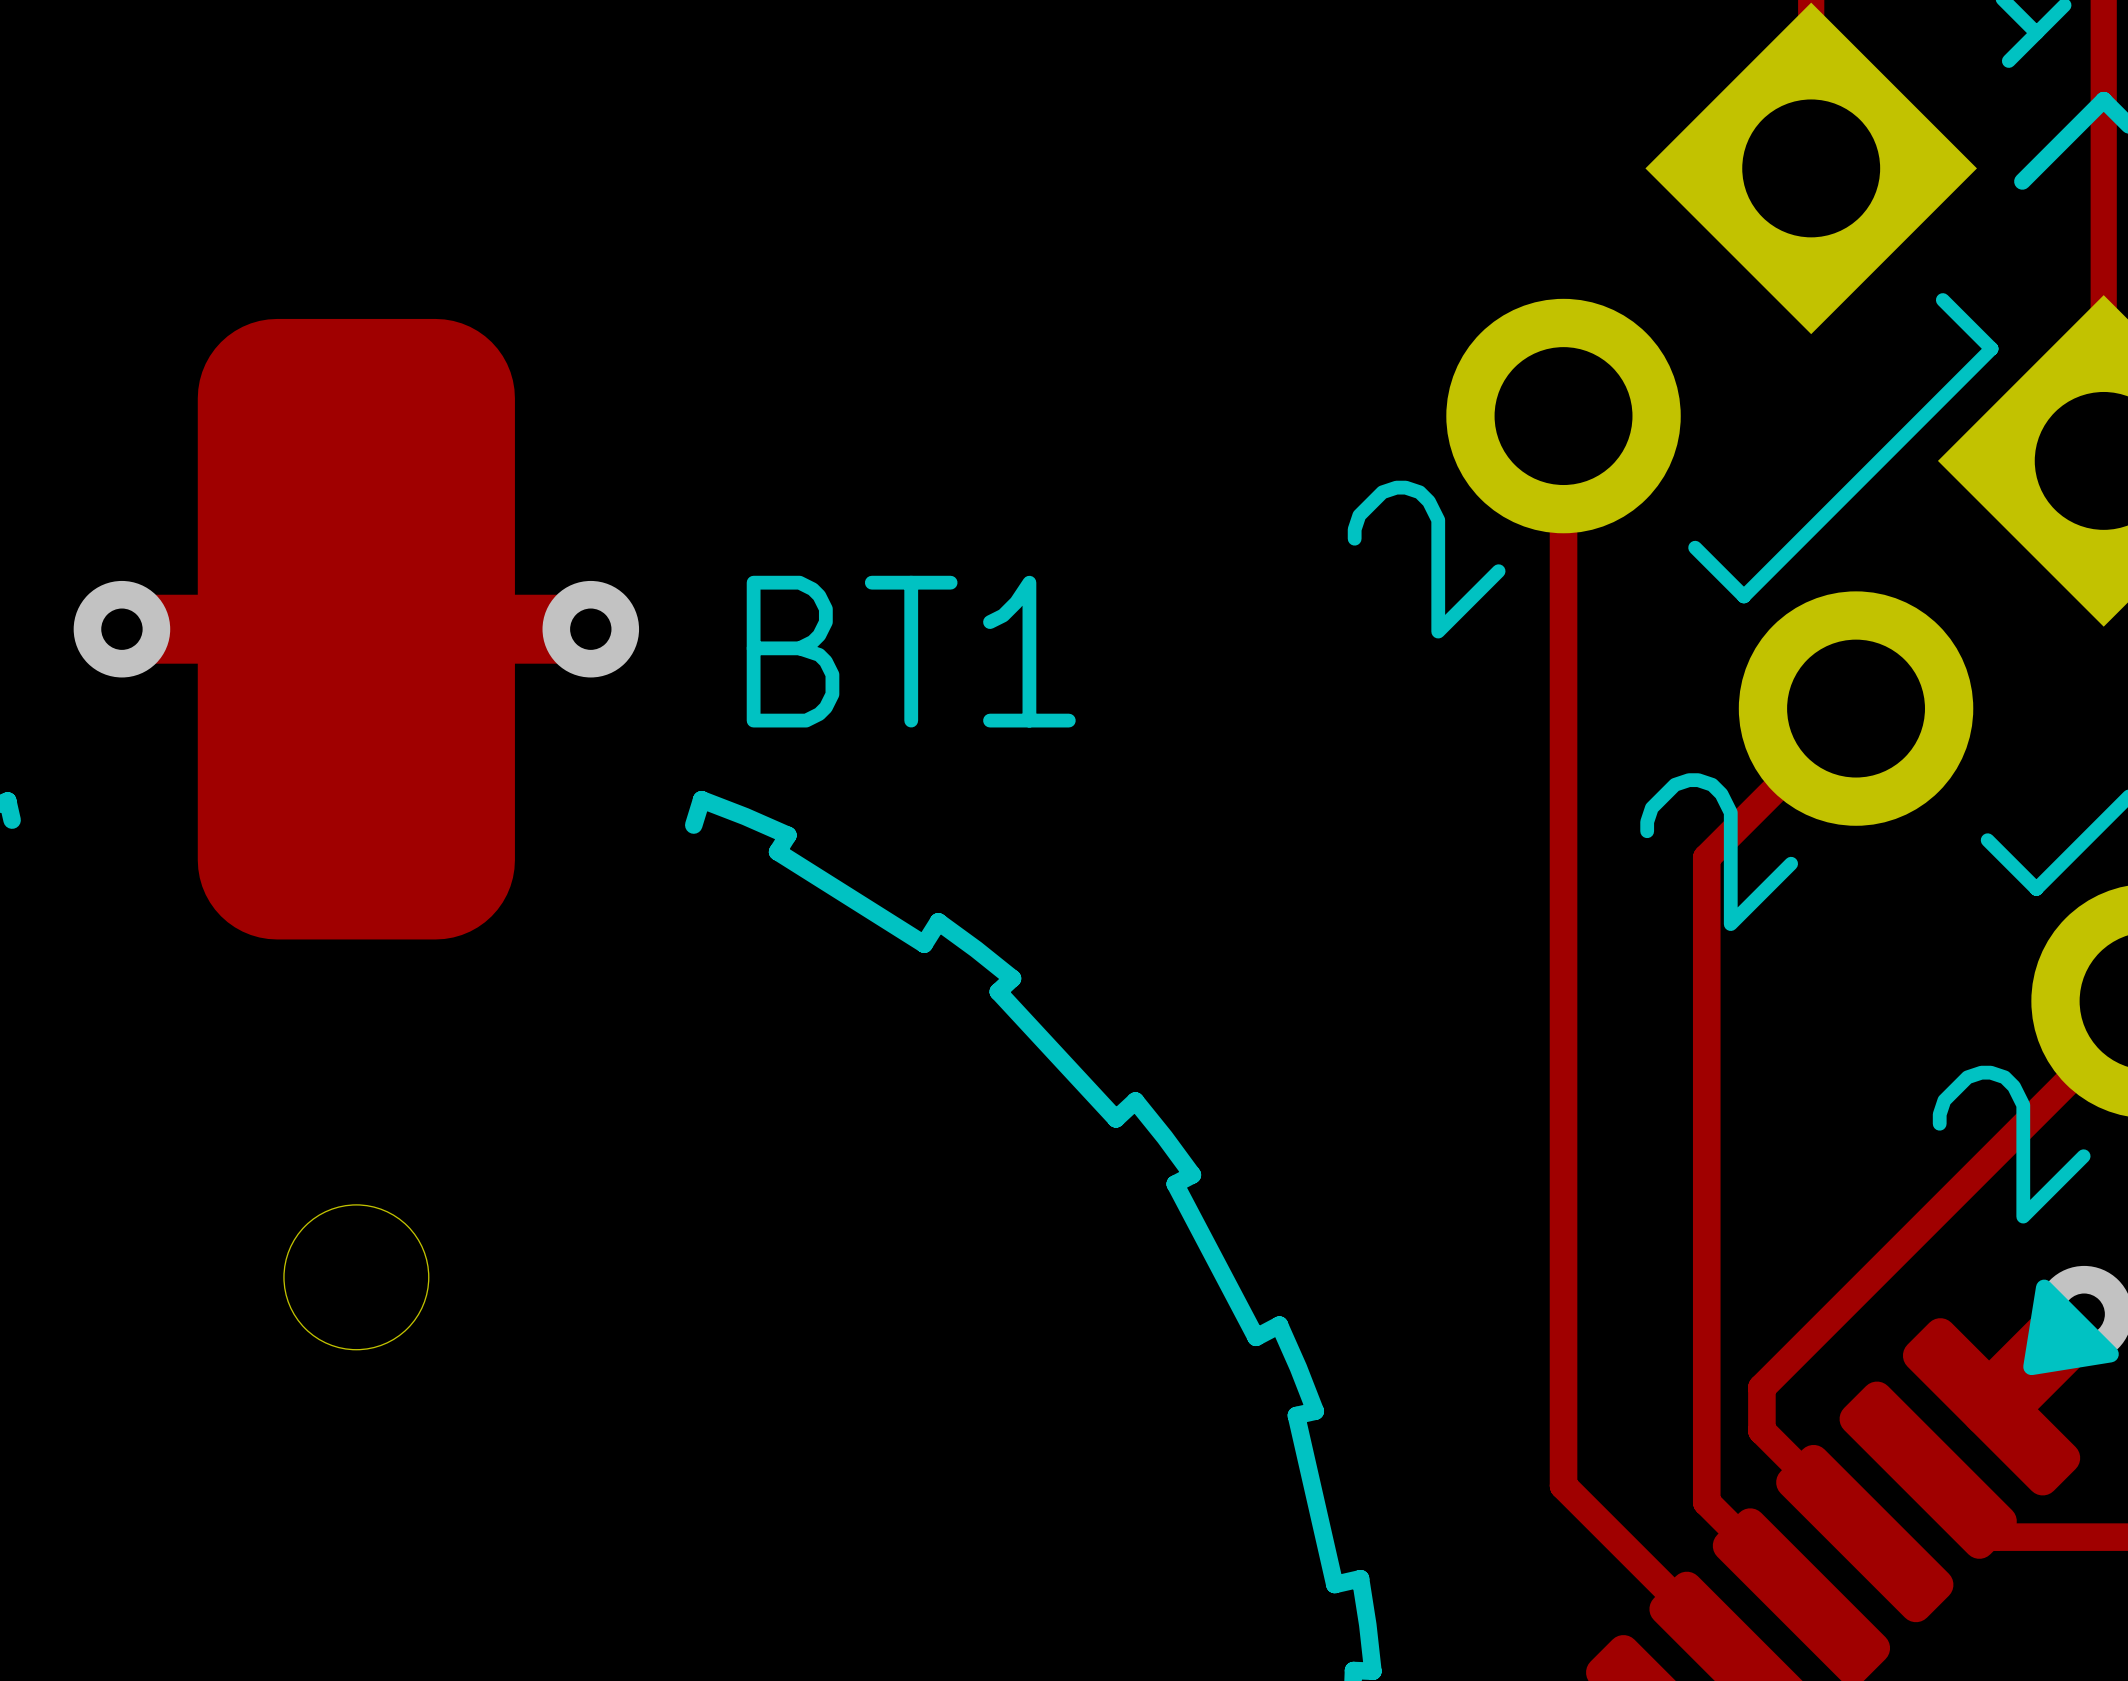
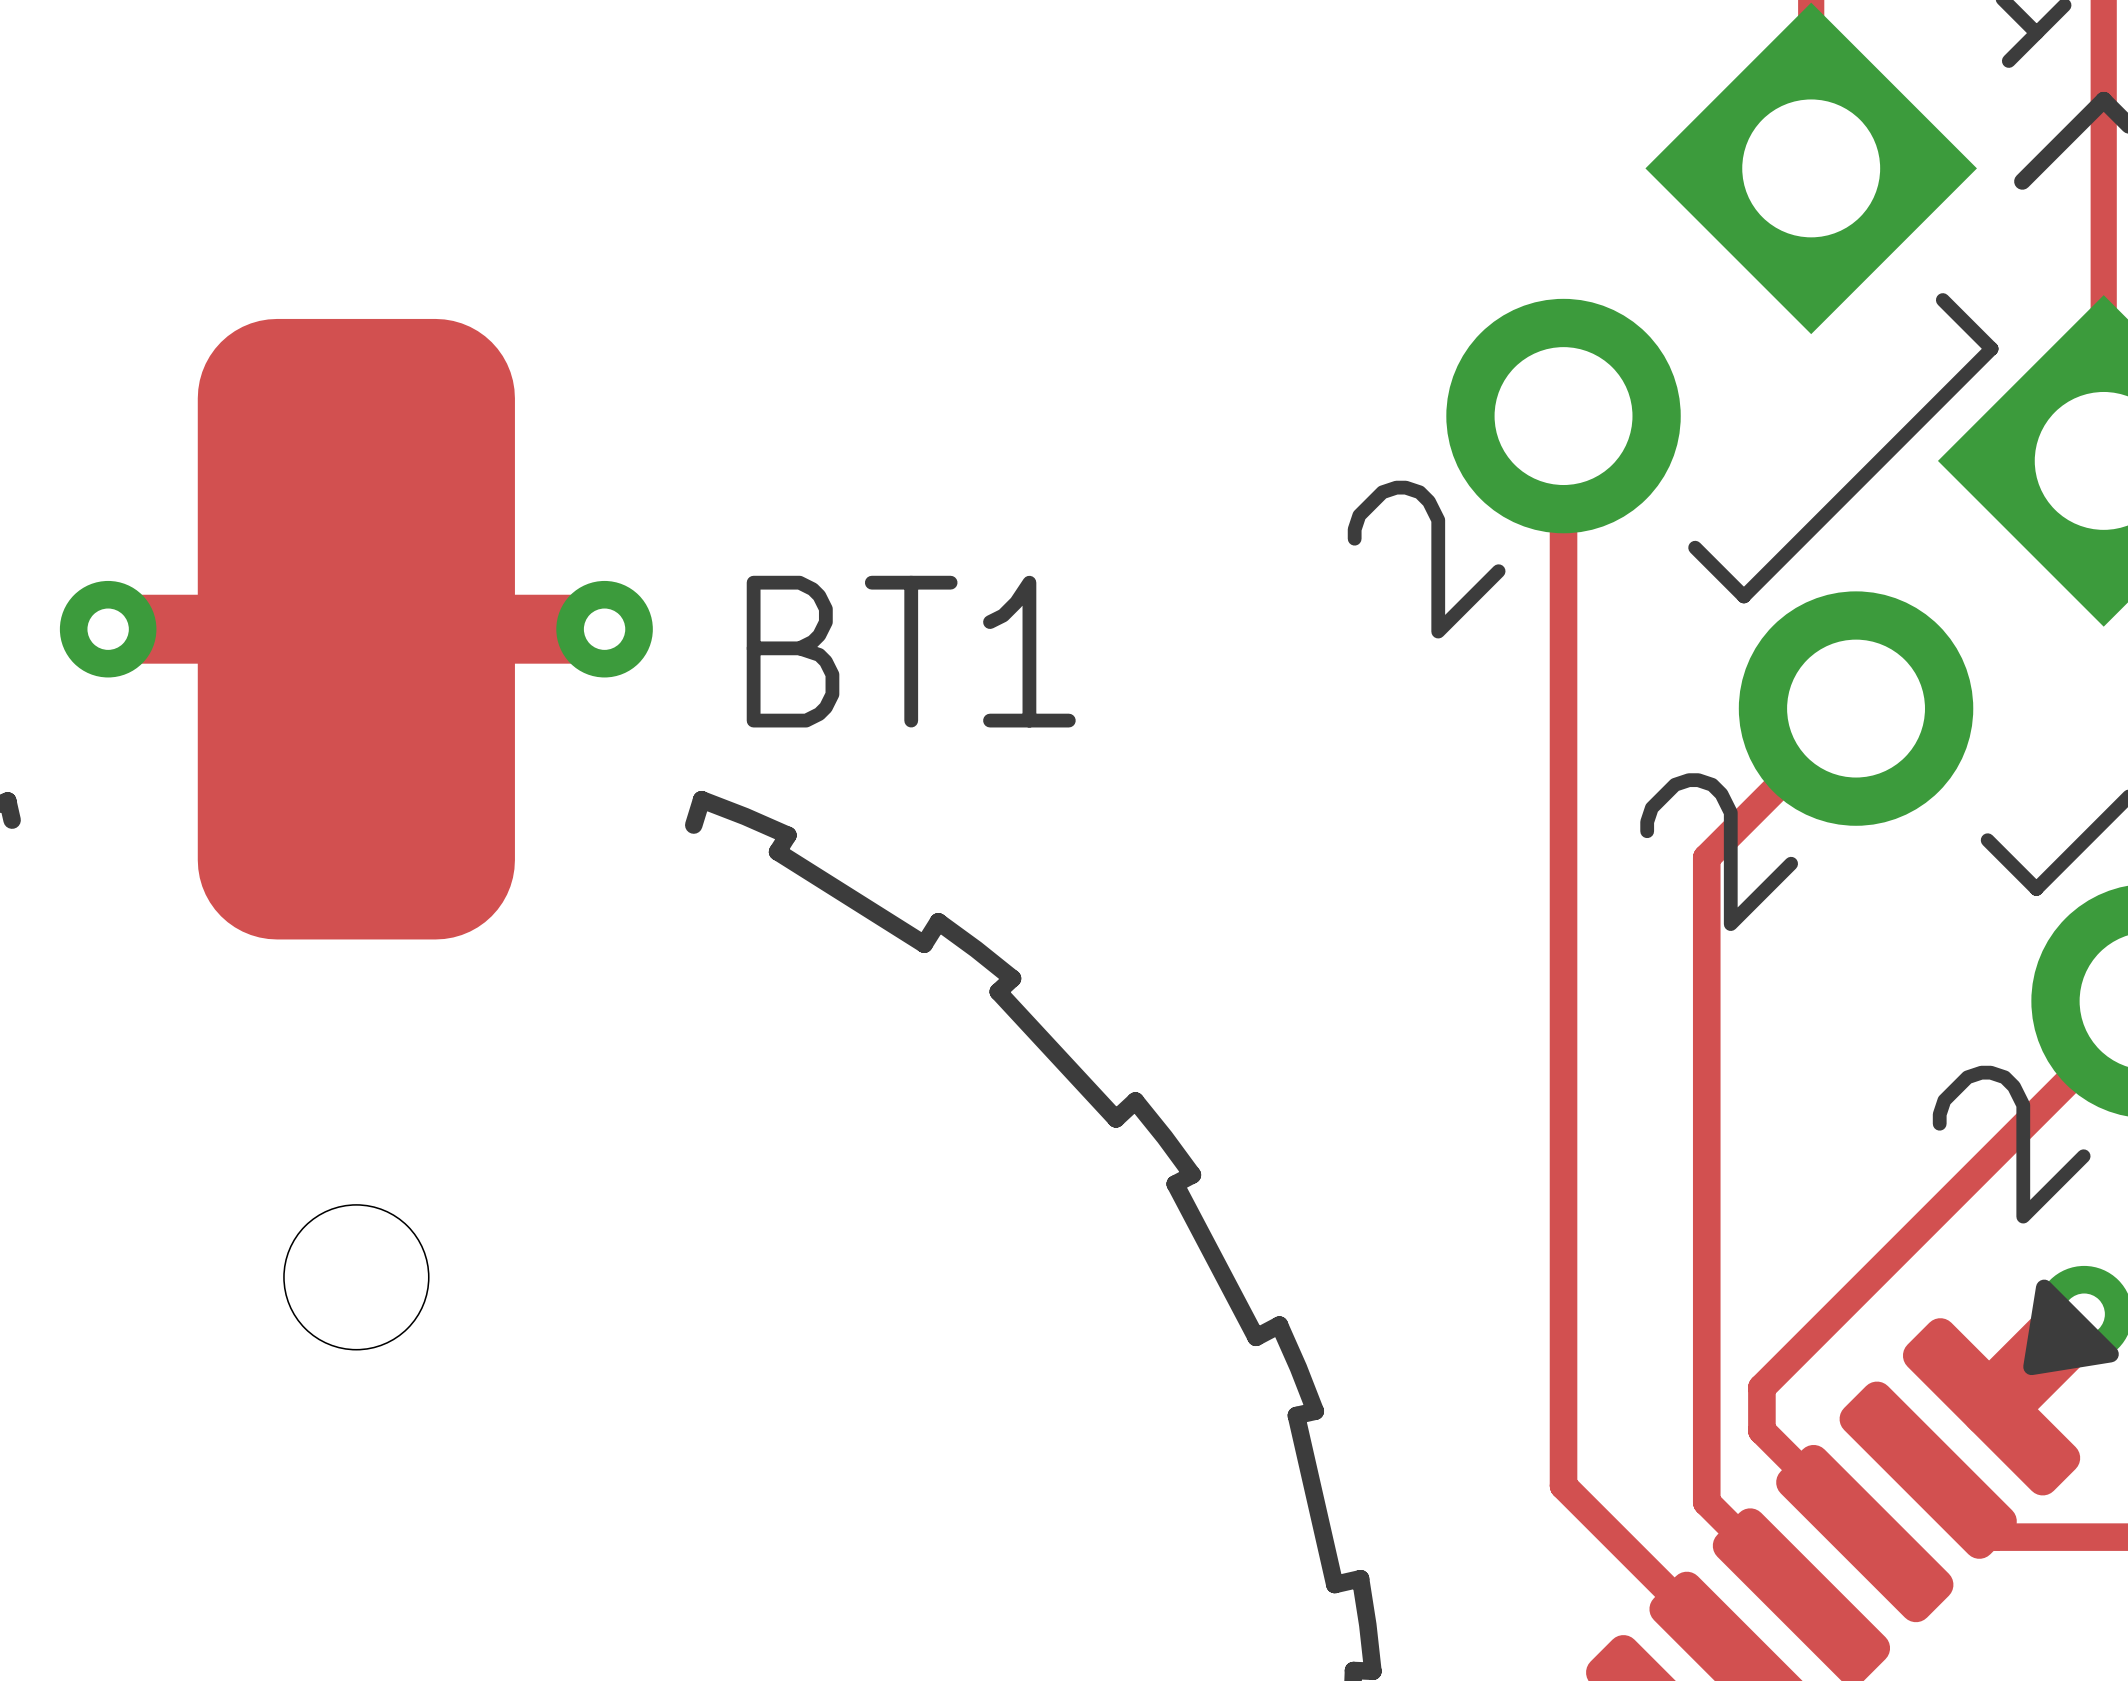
via position: (121, 629) -> (108, 629)
via position: (590, 629) -> (604, 629)

